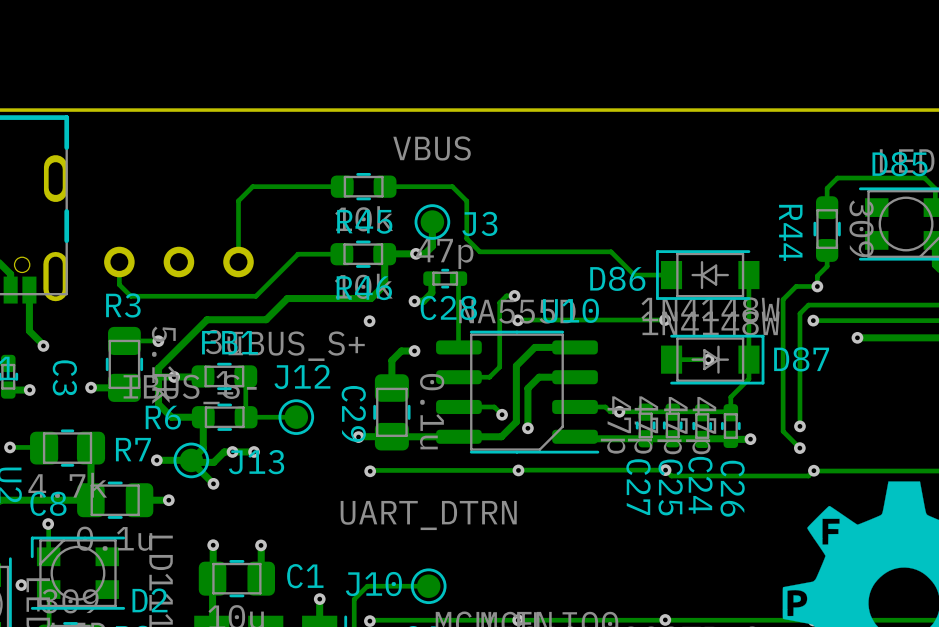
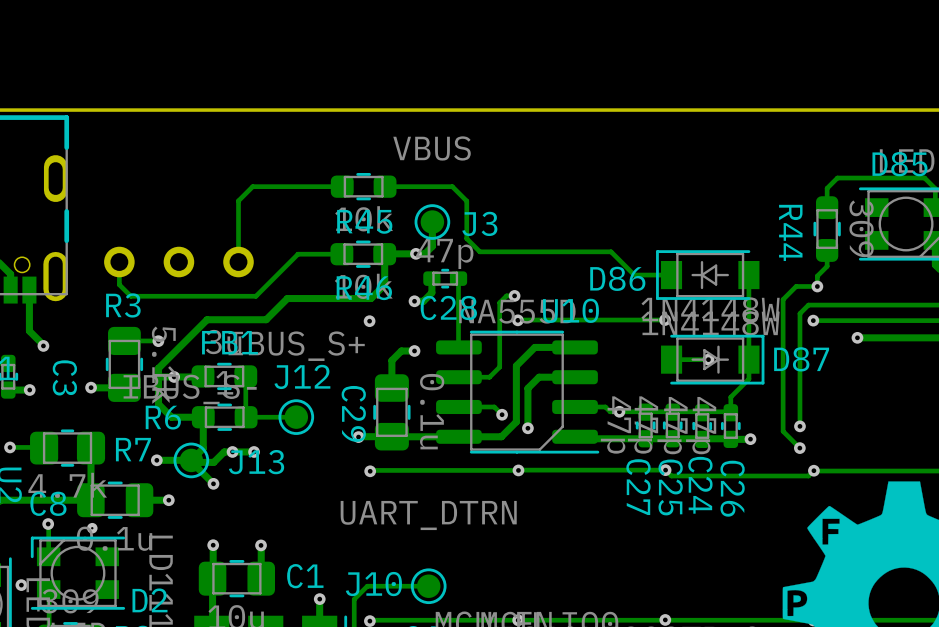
via: none -> (92, 528)

